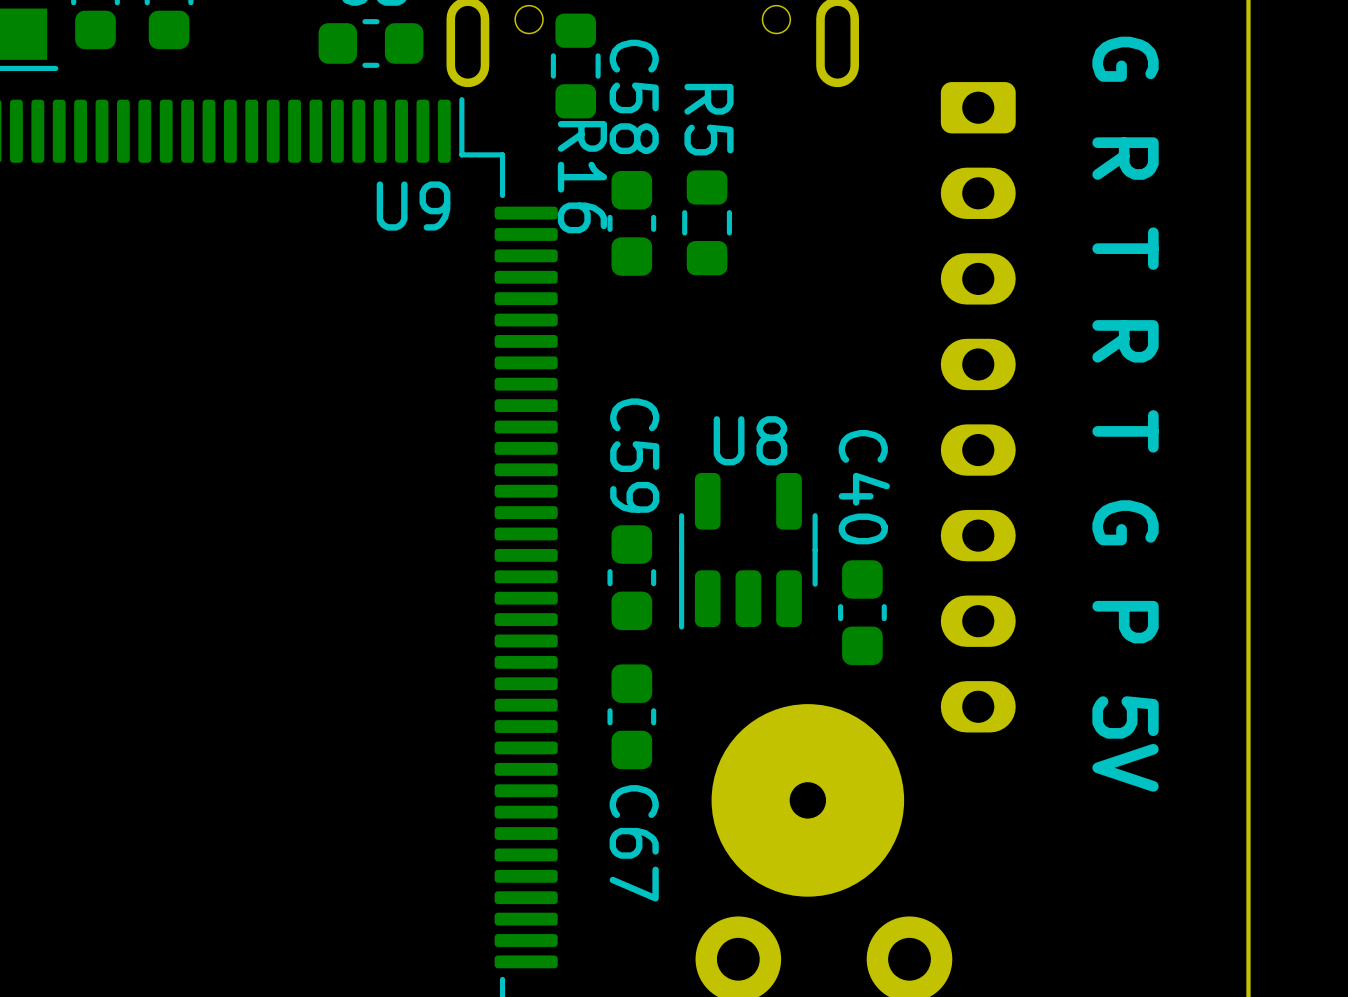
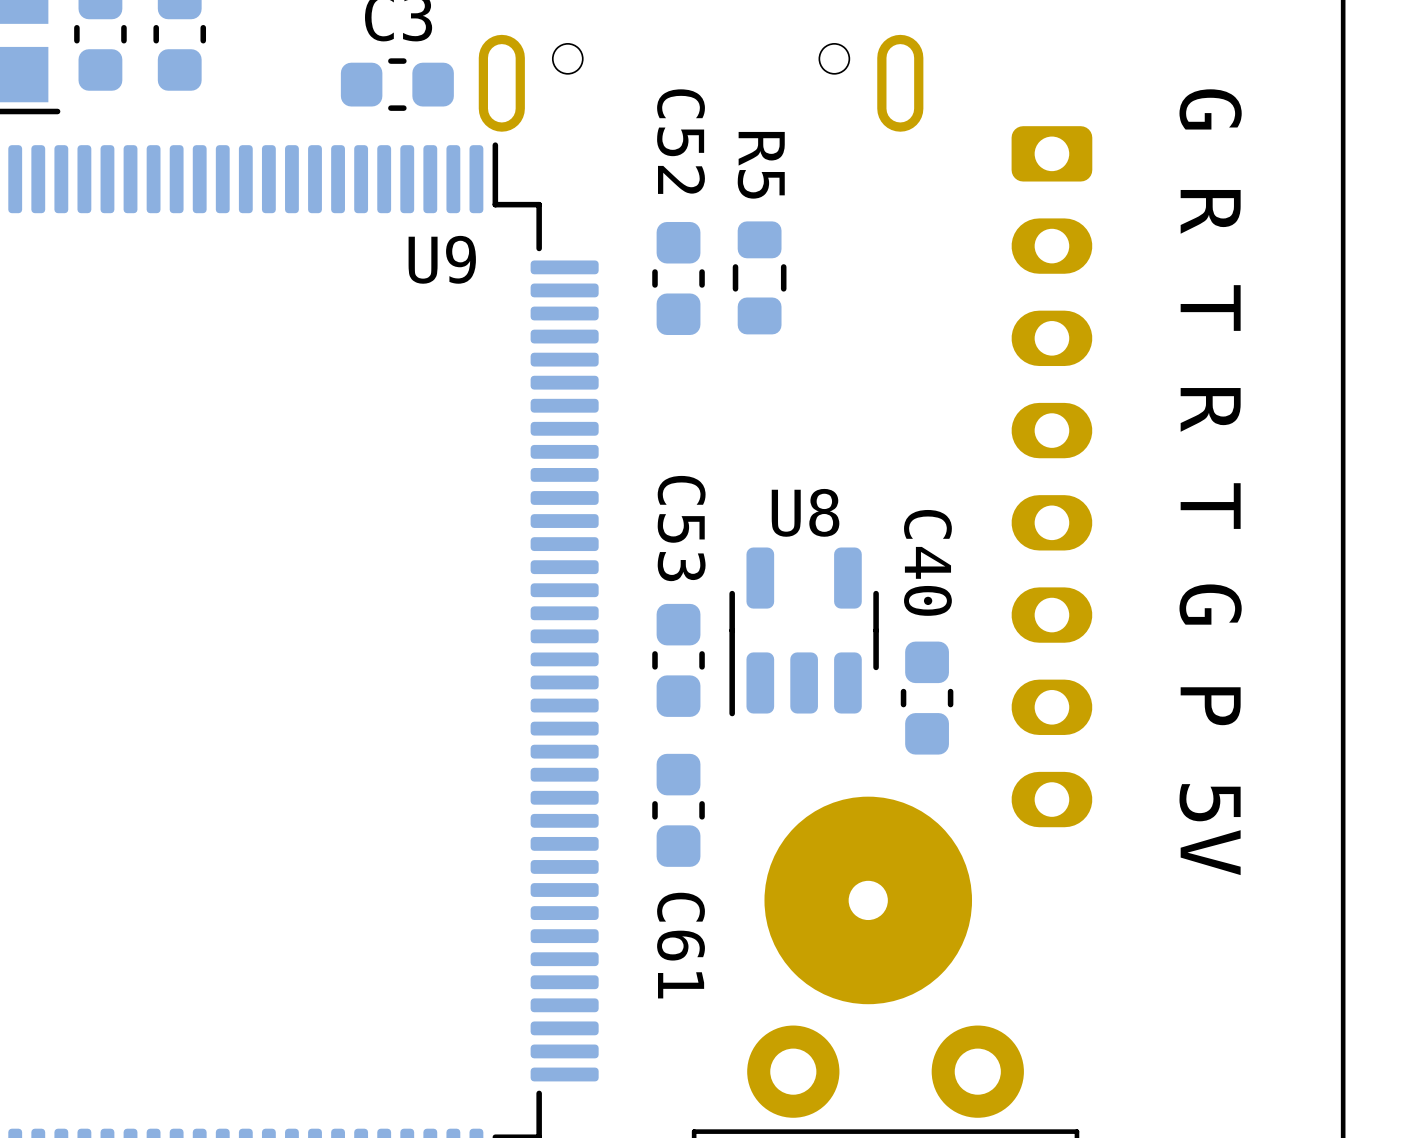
R16: (575, 66) -> none
C58 name: C58 (634, 96) -> C52 (681, 141)
C59 name: C59 (634, 455) -> C53 (681, 528)
C67 name: C67 (634, 843) -> C61 (681, 945)

